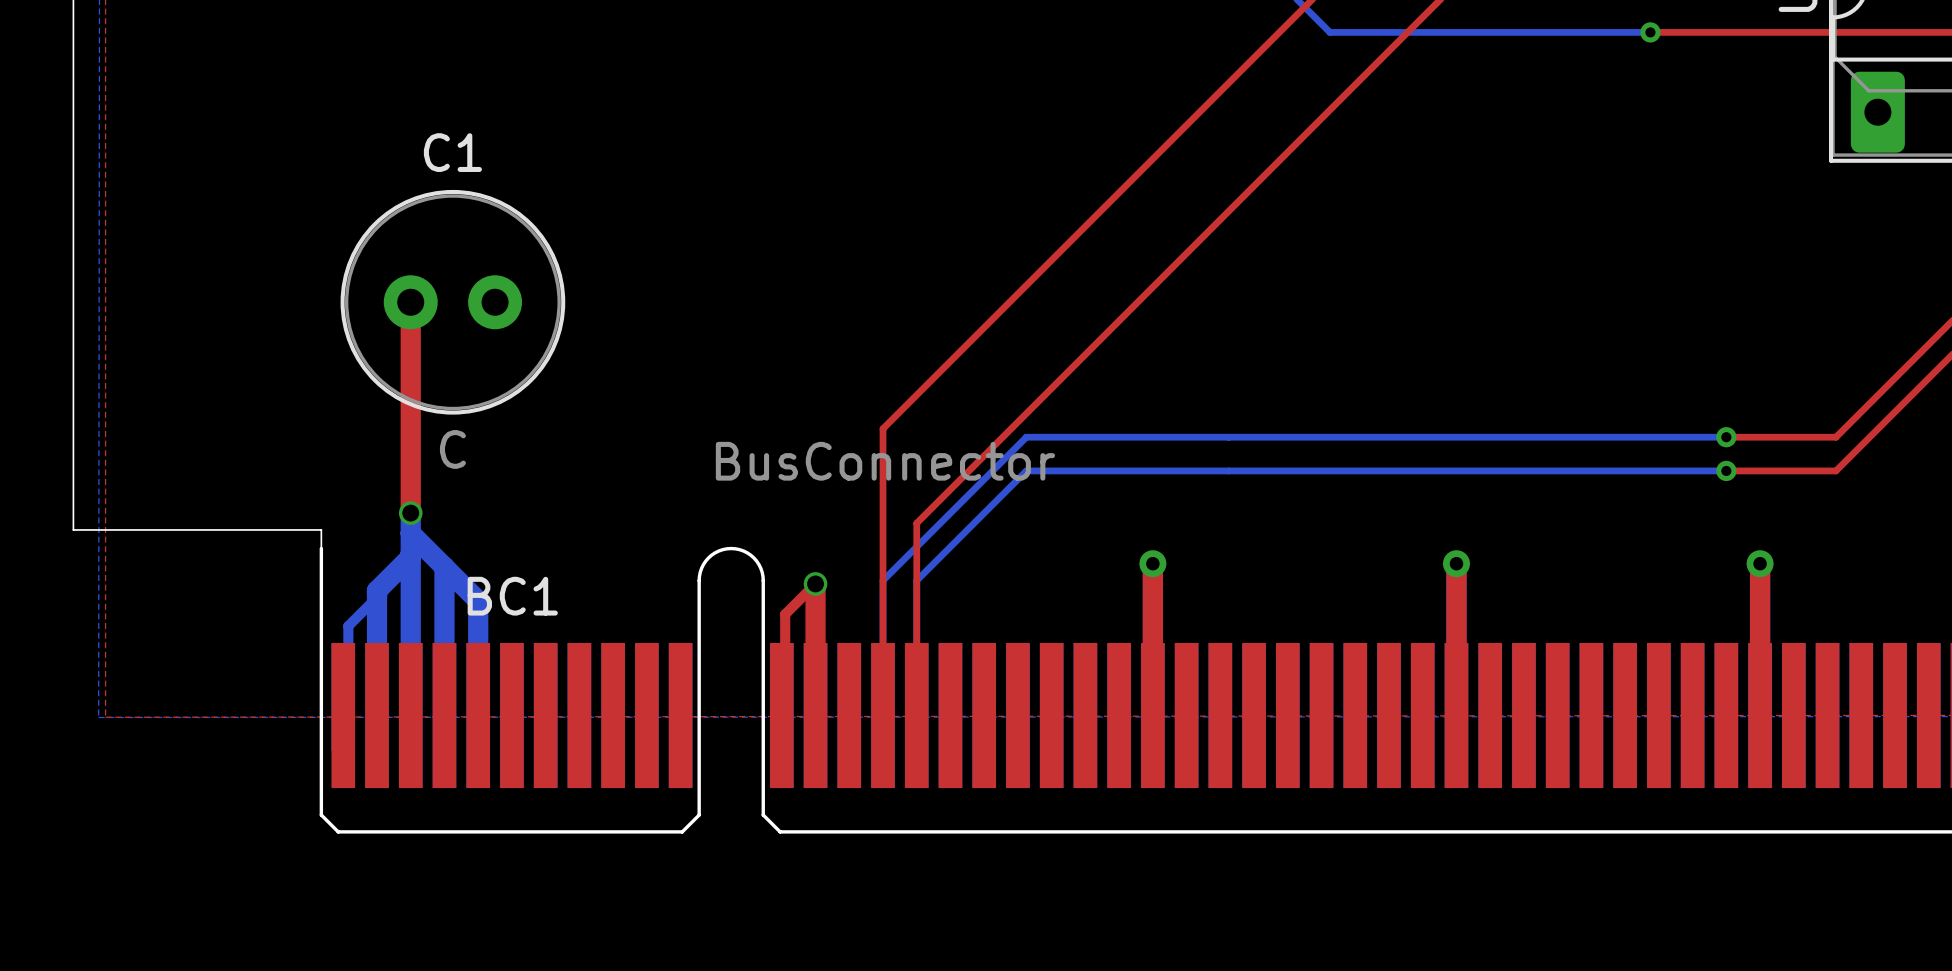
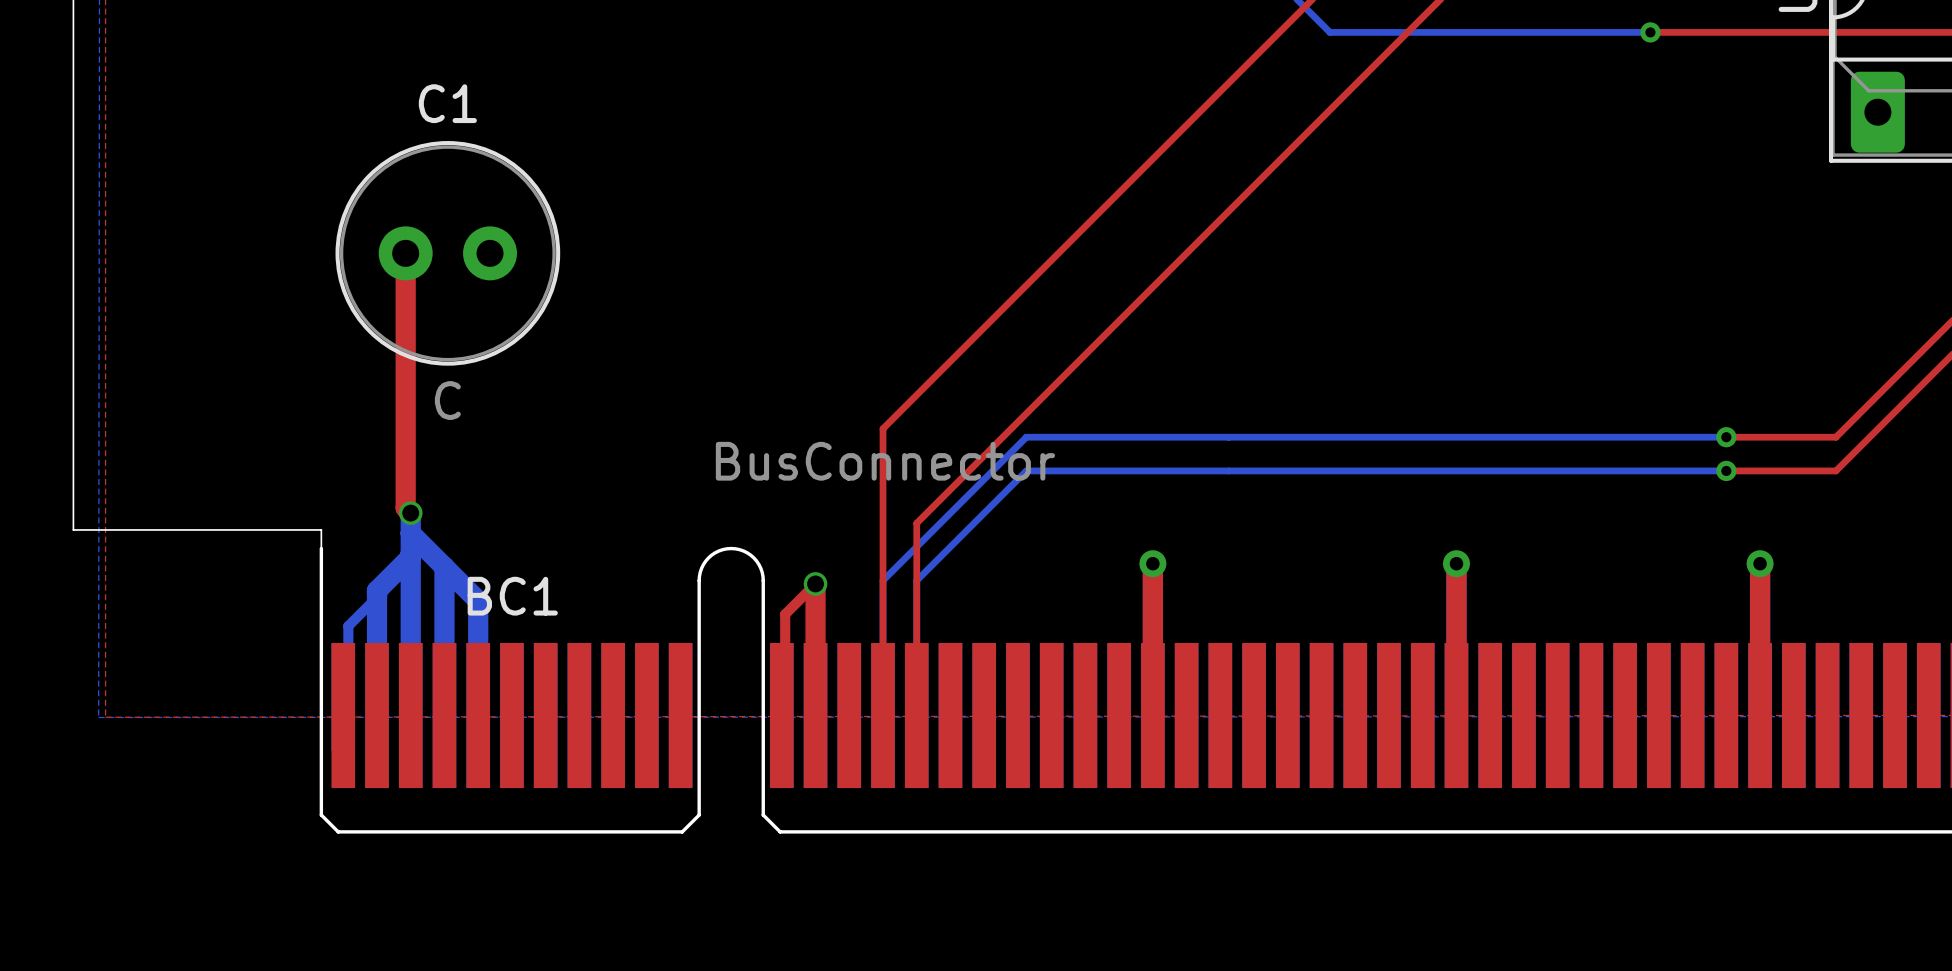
top track: (410, 302) (410, 513) -> (405, 253) (405, 508) (410, 513)
C1 position: (452, 302) -> (447, 253)

